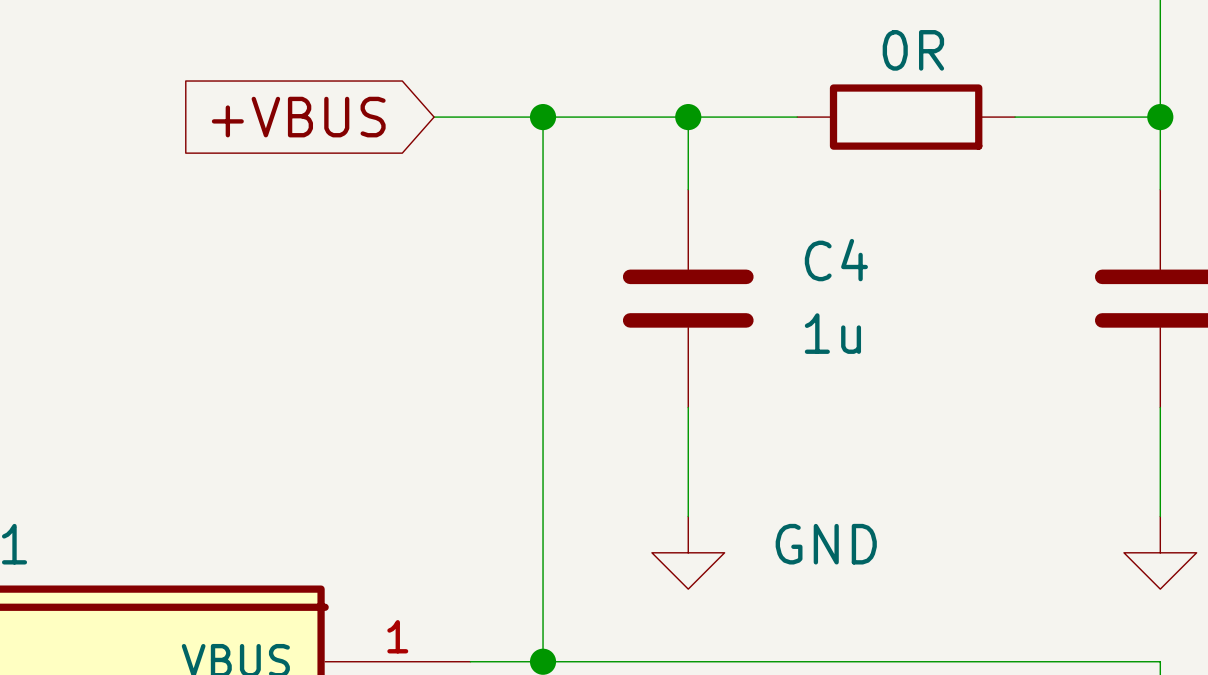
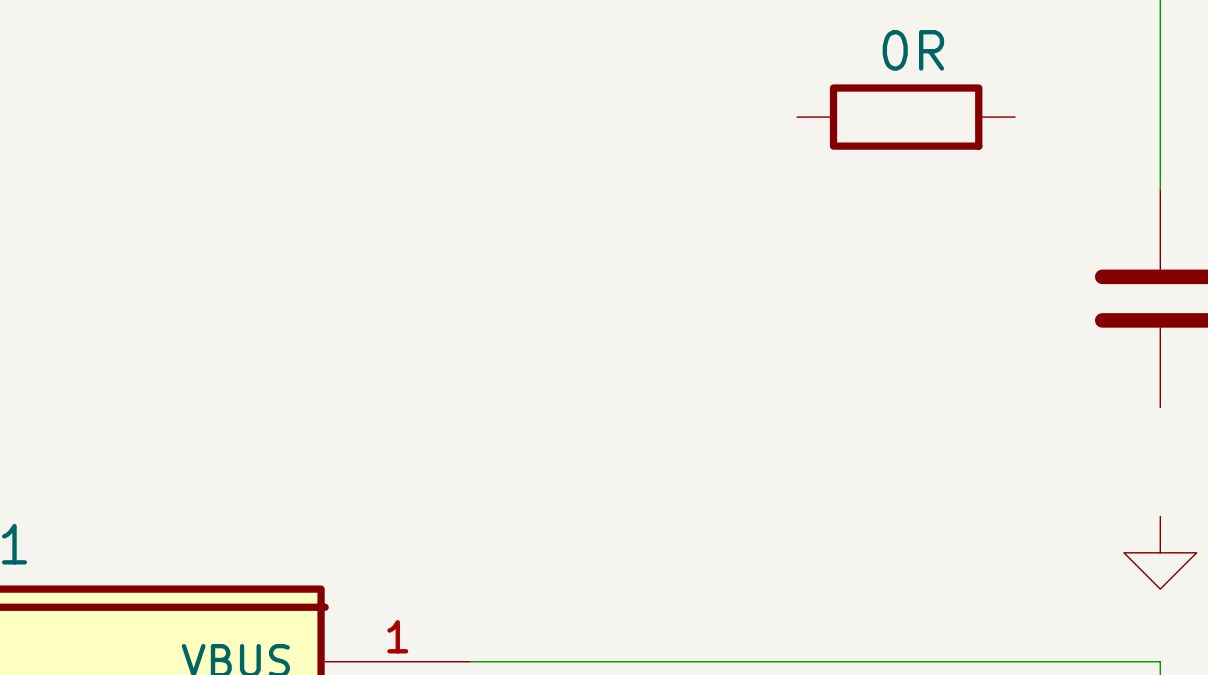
global label: +VBUS (298, 117) -> none
wire: (434, 117) (797, 117) -> none
wire: (543, 117) (543, 661) -> none
junction: (543, 117) -> none
wire: (688, 117) (688, 189) -> none
junction: (688, 117) -> none
wire: (1015, 117) (1160, 117) -> none
junction: (1160, 117) -> none
C4: 1u (688, 298) -> none
wire: (688, 407) (688, 516) -> none
wire: (1160, 407) (1160, 516) -> none
power symbol: GND (688, 552) -> none
junction: (543, 661) -> none

